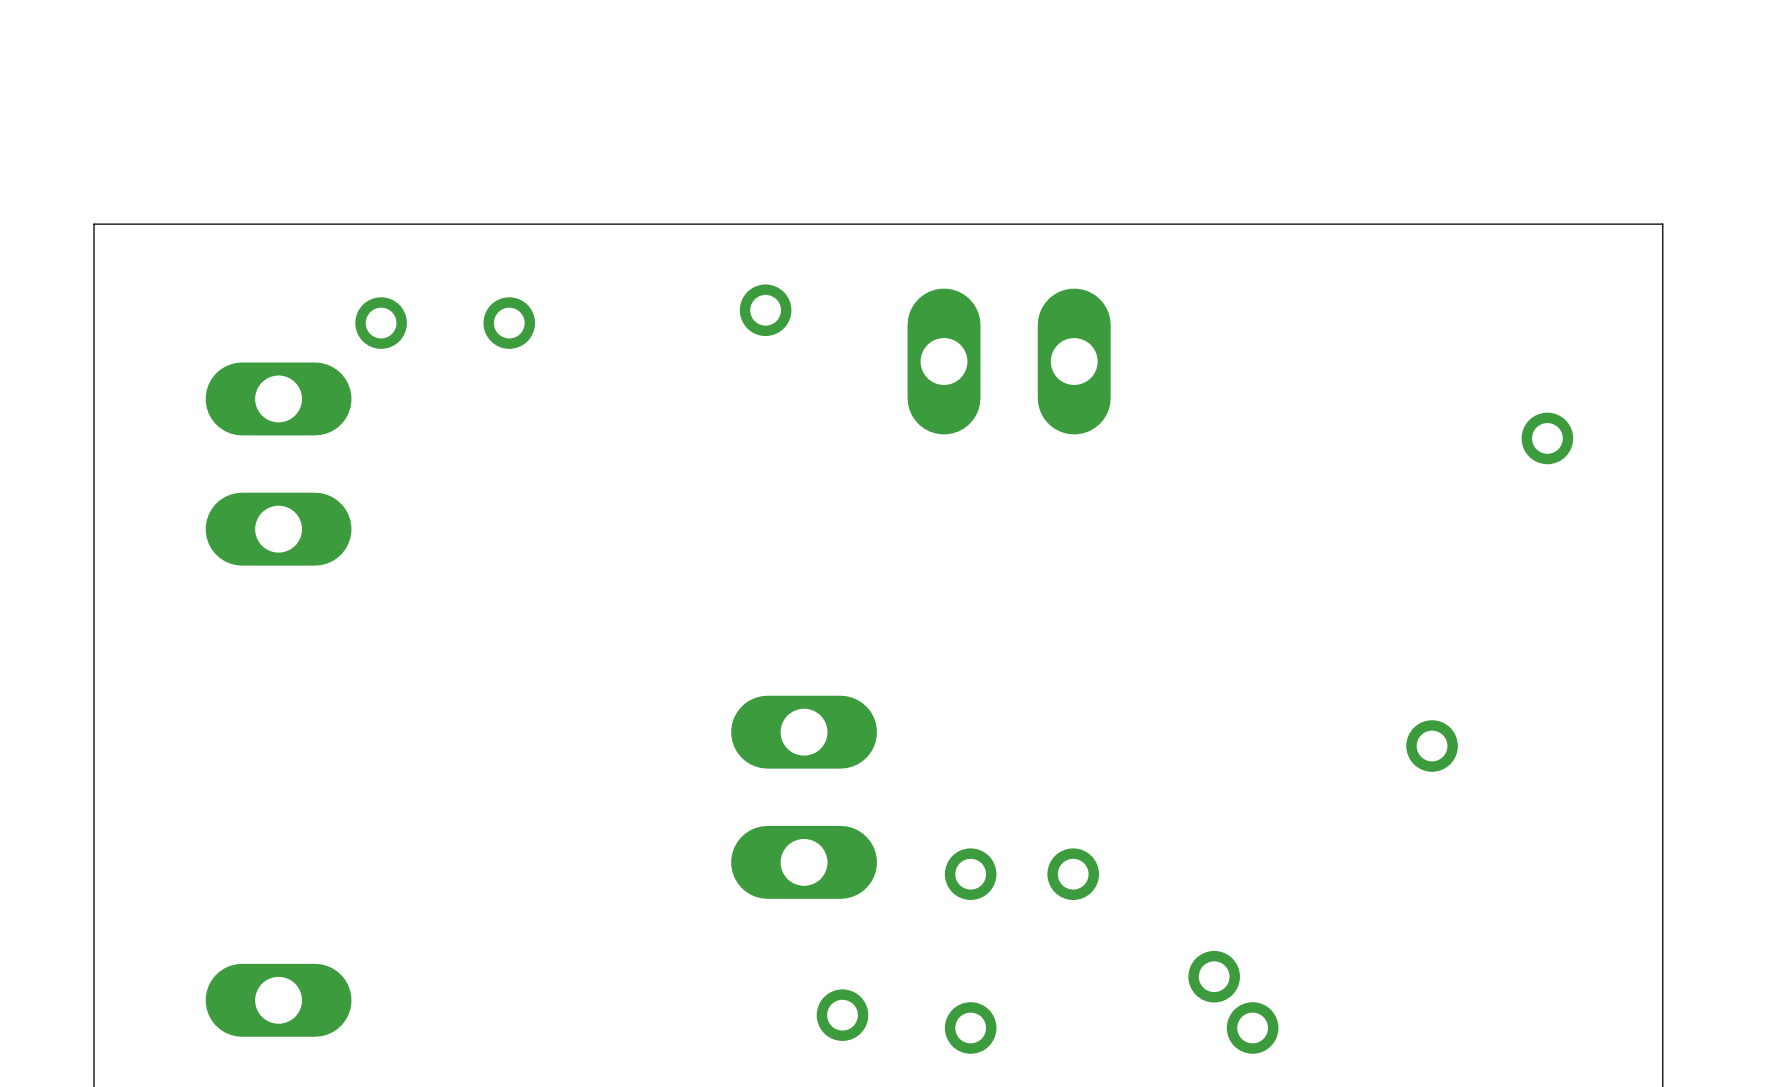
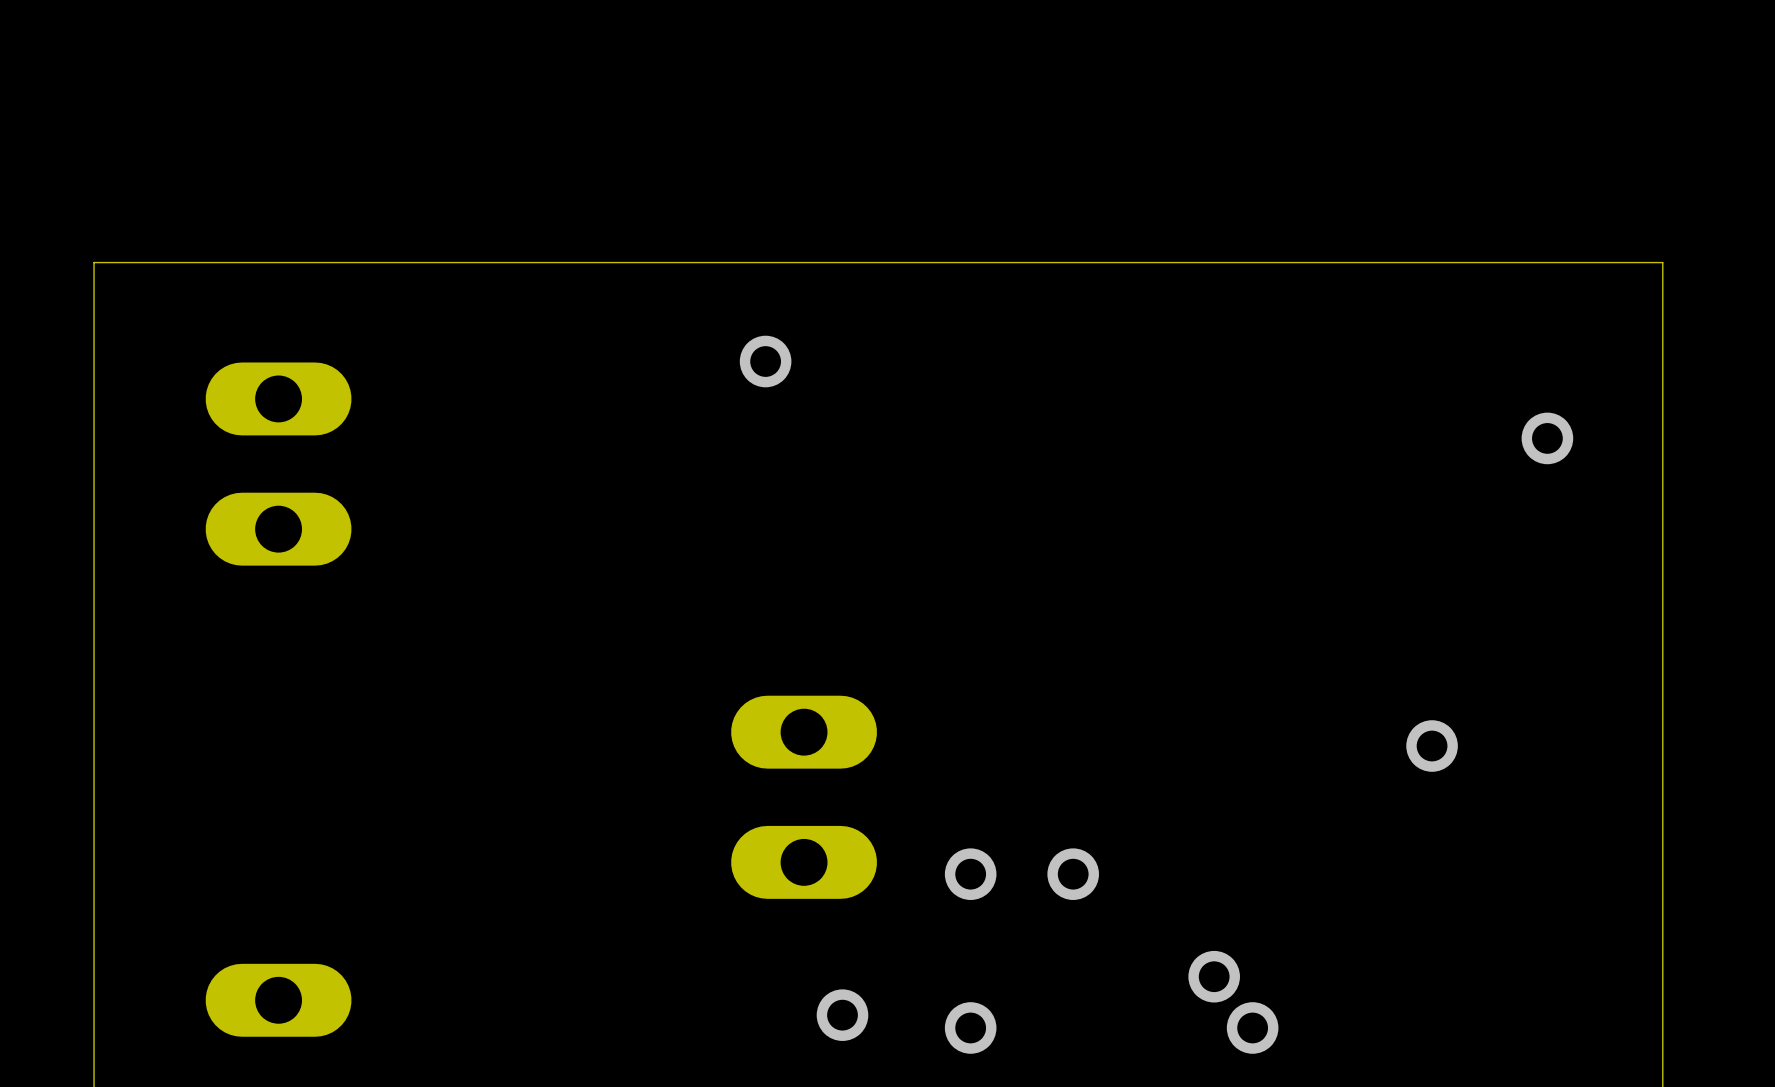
board edge: (1662, 262) (1662, 224) (94, 224) (94, 262) -> (1662, 262) (94, 262)
via position: (765, 310) -> (765, 361)
via: (381, 323) -> none
via: (509, 323) -> none
part: (1009, 361) -> none

